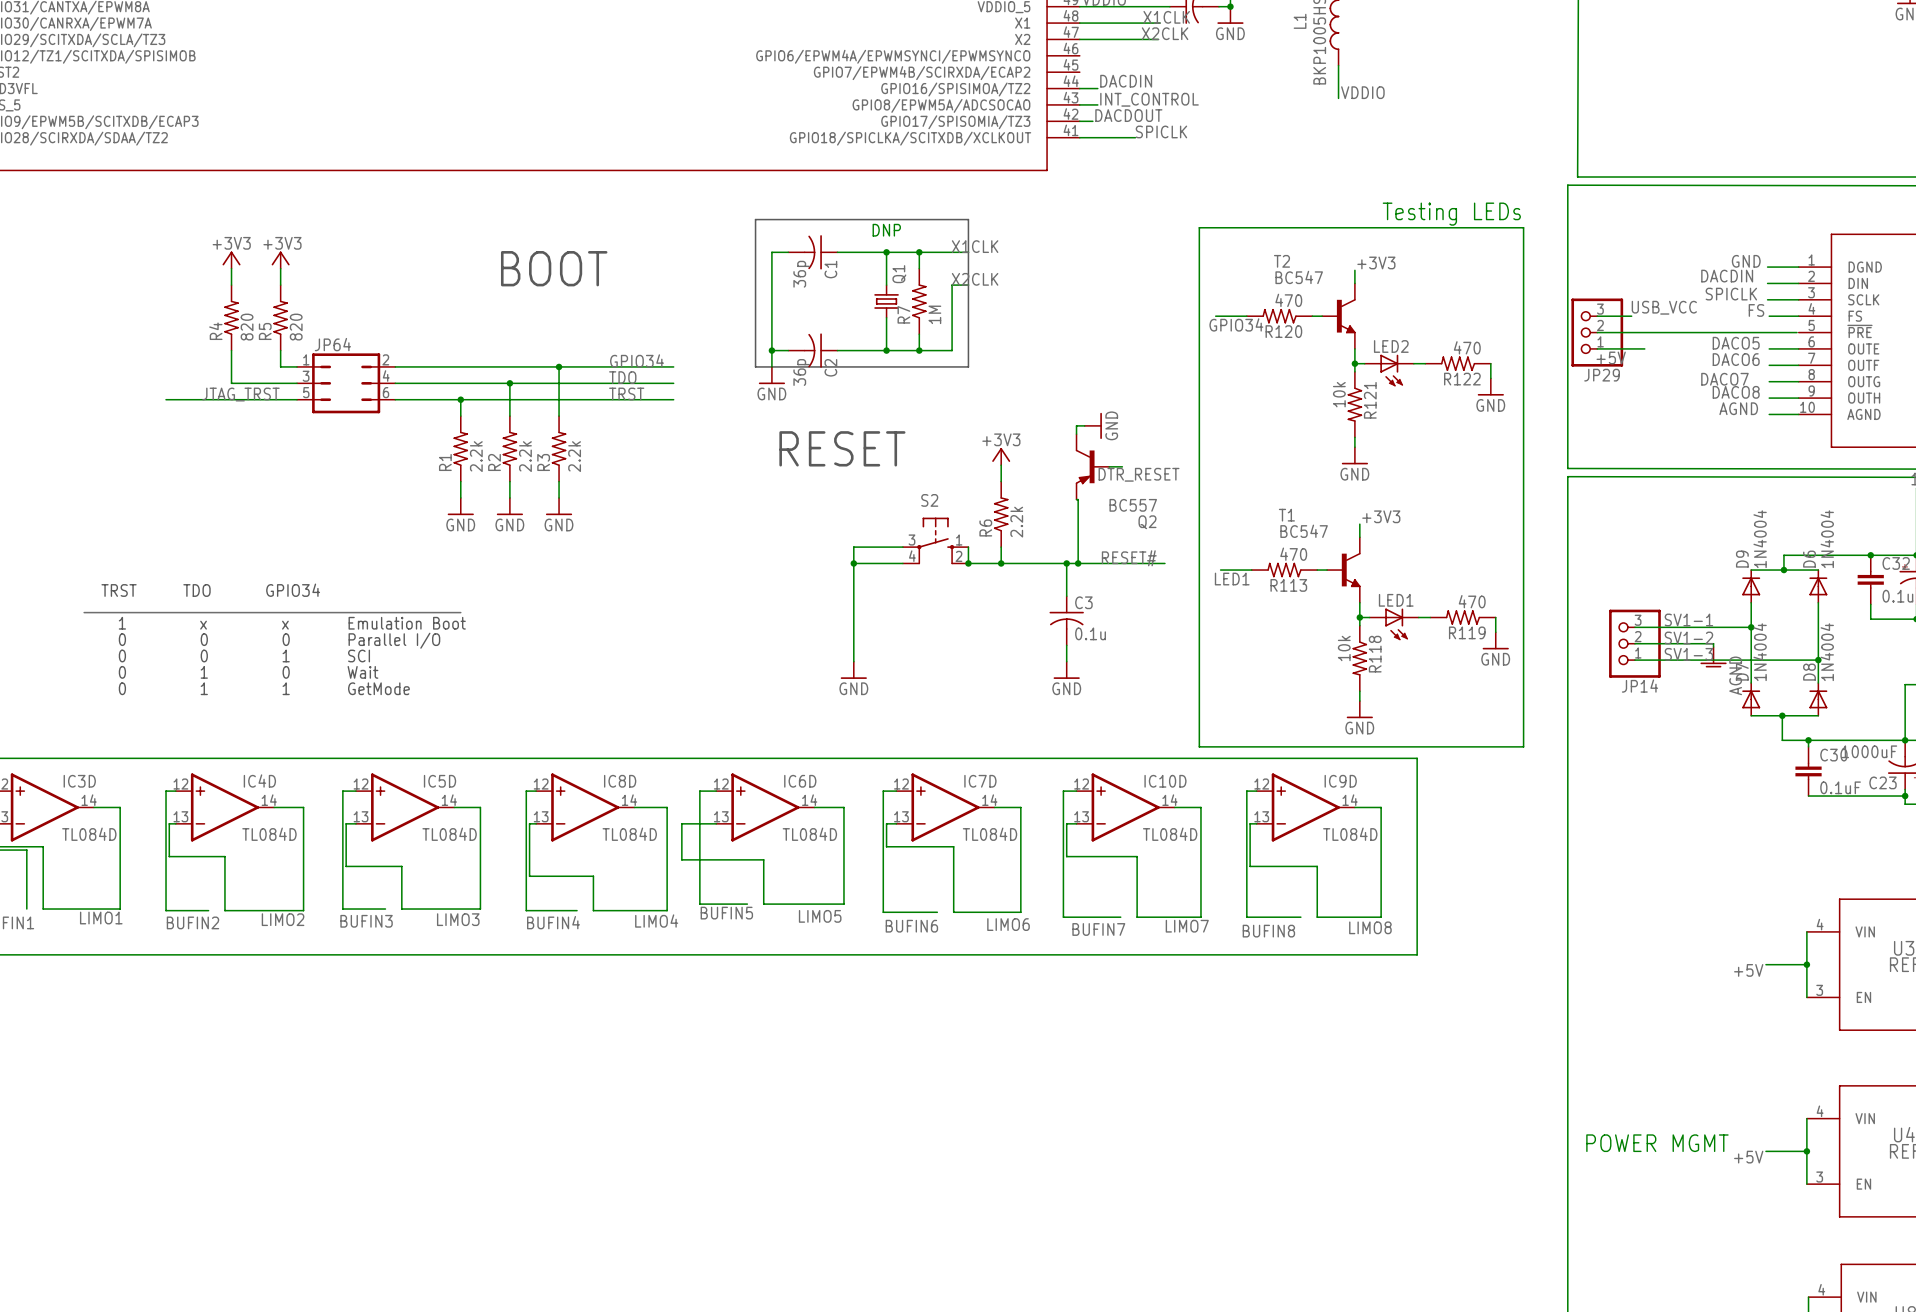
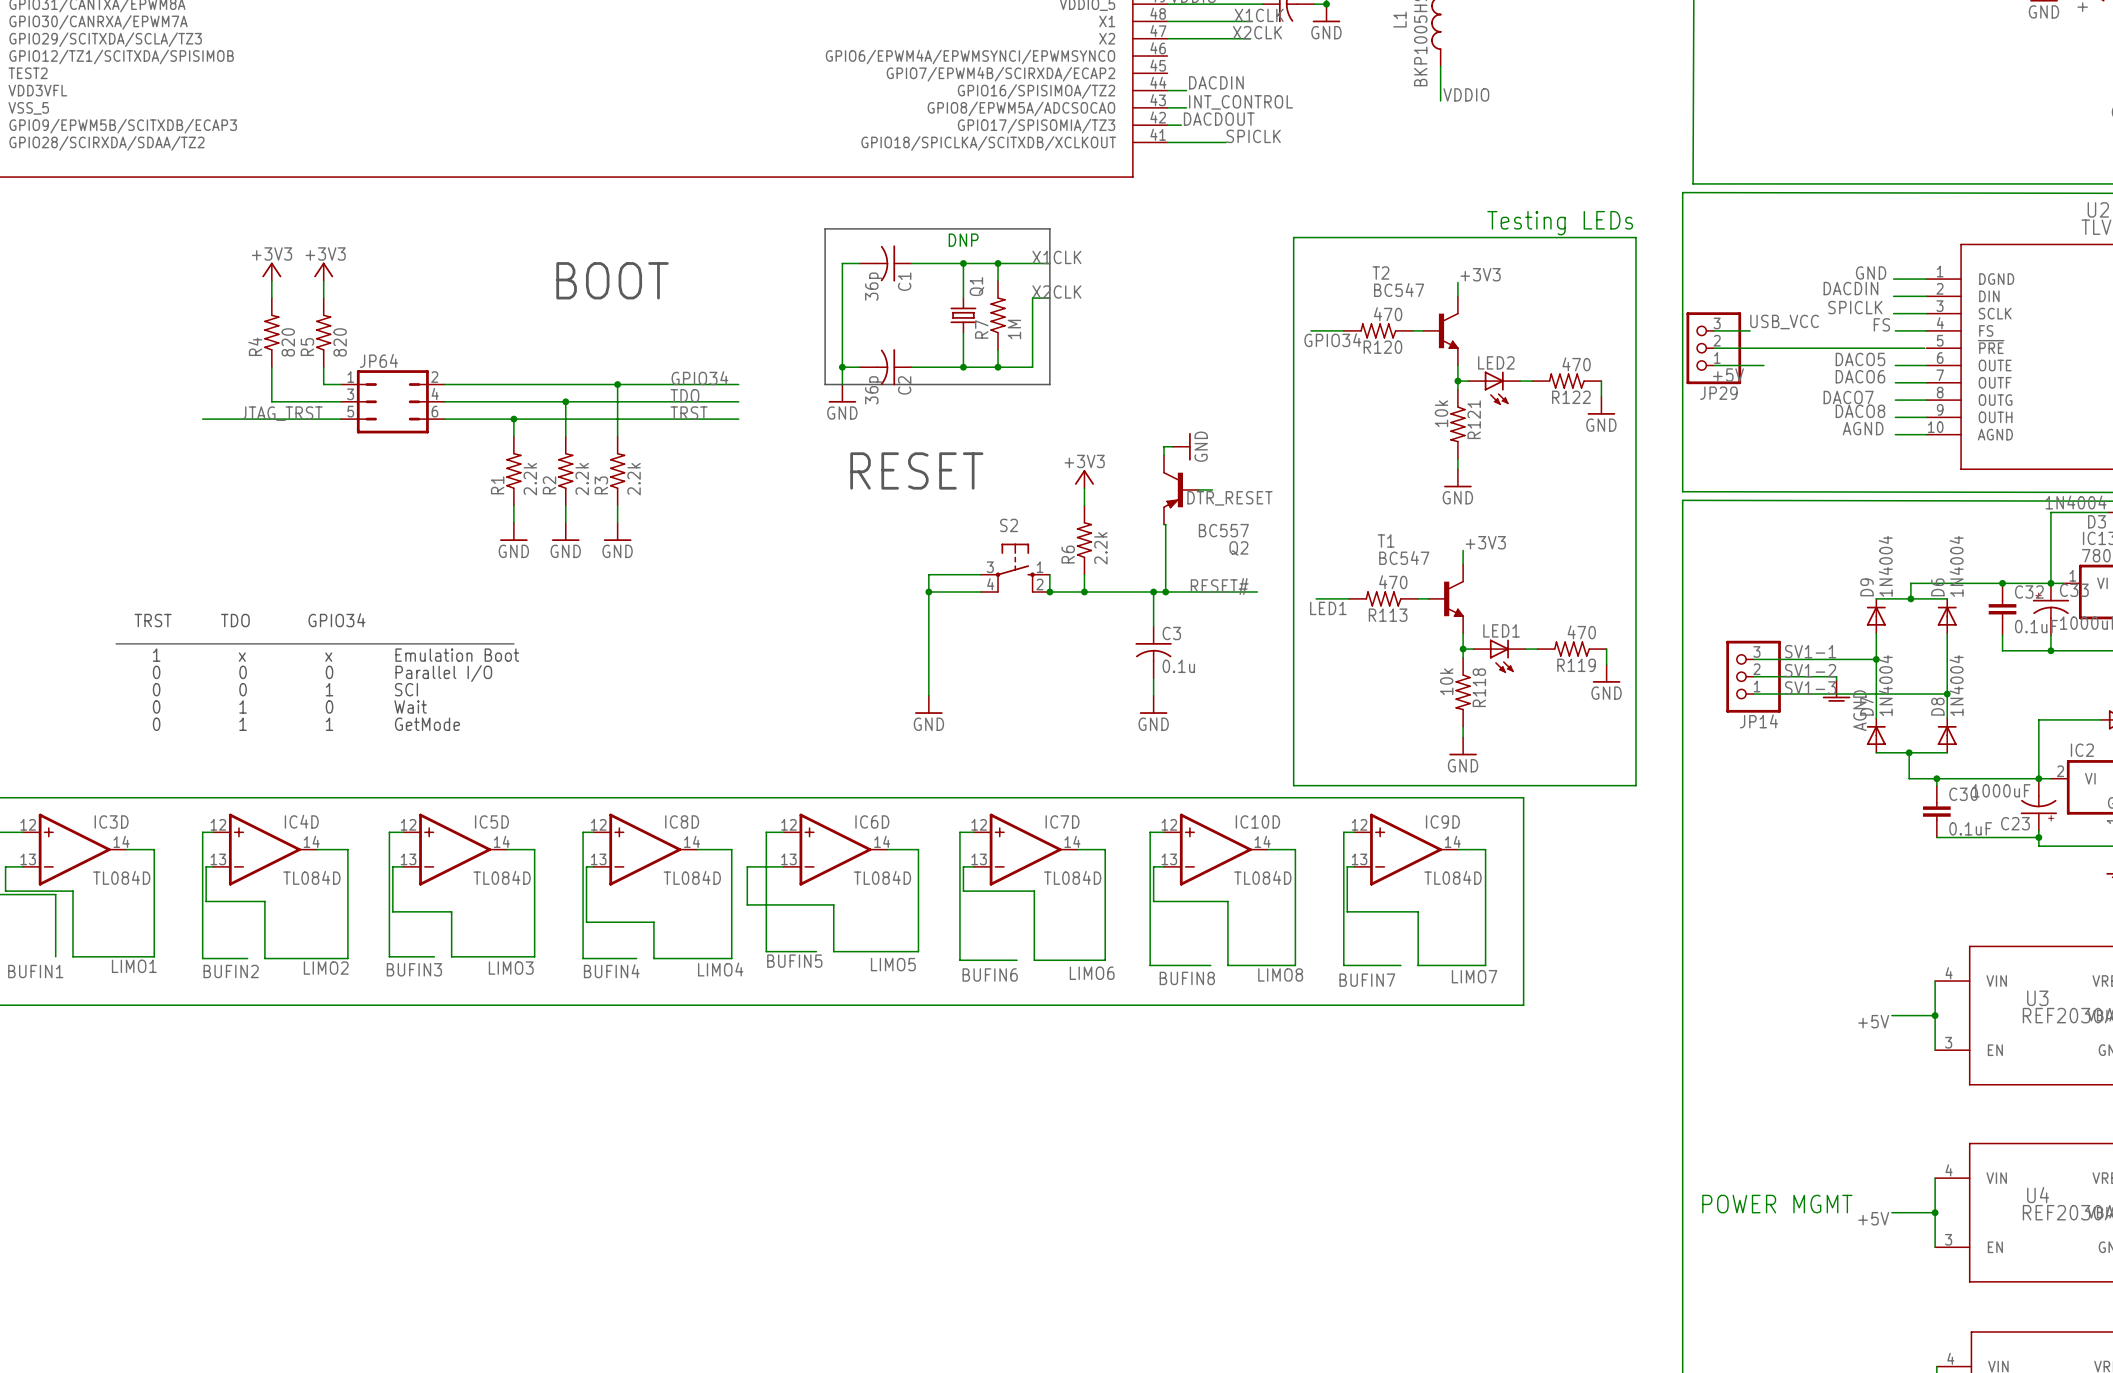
label: LIMO7 (1187, 926) -> LIMO8 (1280, 974)
label: LIMO8 (1370, 927) -> LIMO7 (1474, 976)
label: BUFIN7 (1098, 929) -> BUFIN8 (1187, 978)
label: BUFIN8 (1268, 931) -> BUFIN7 (1367, 980)

